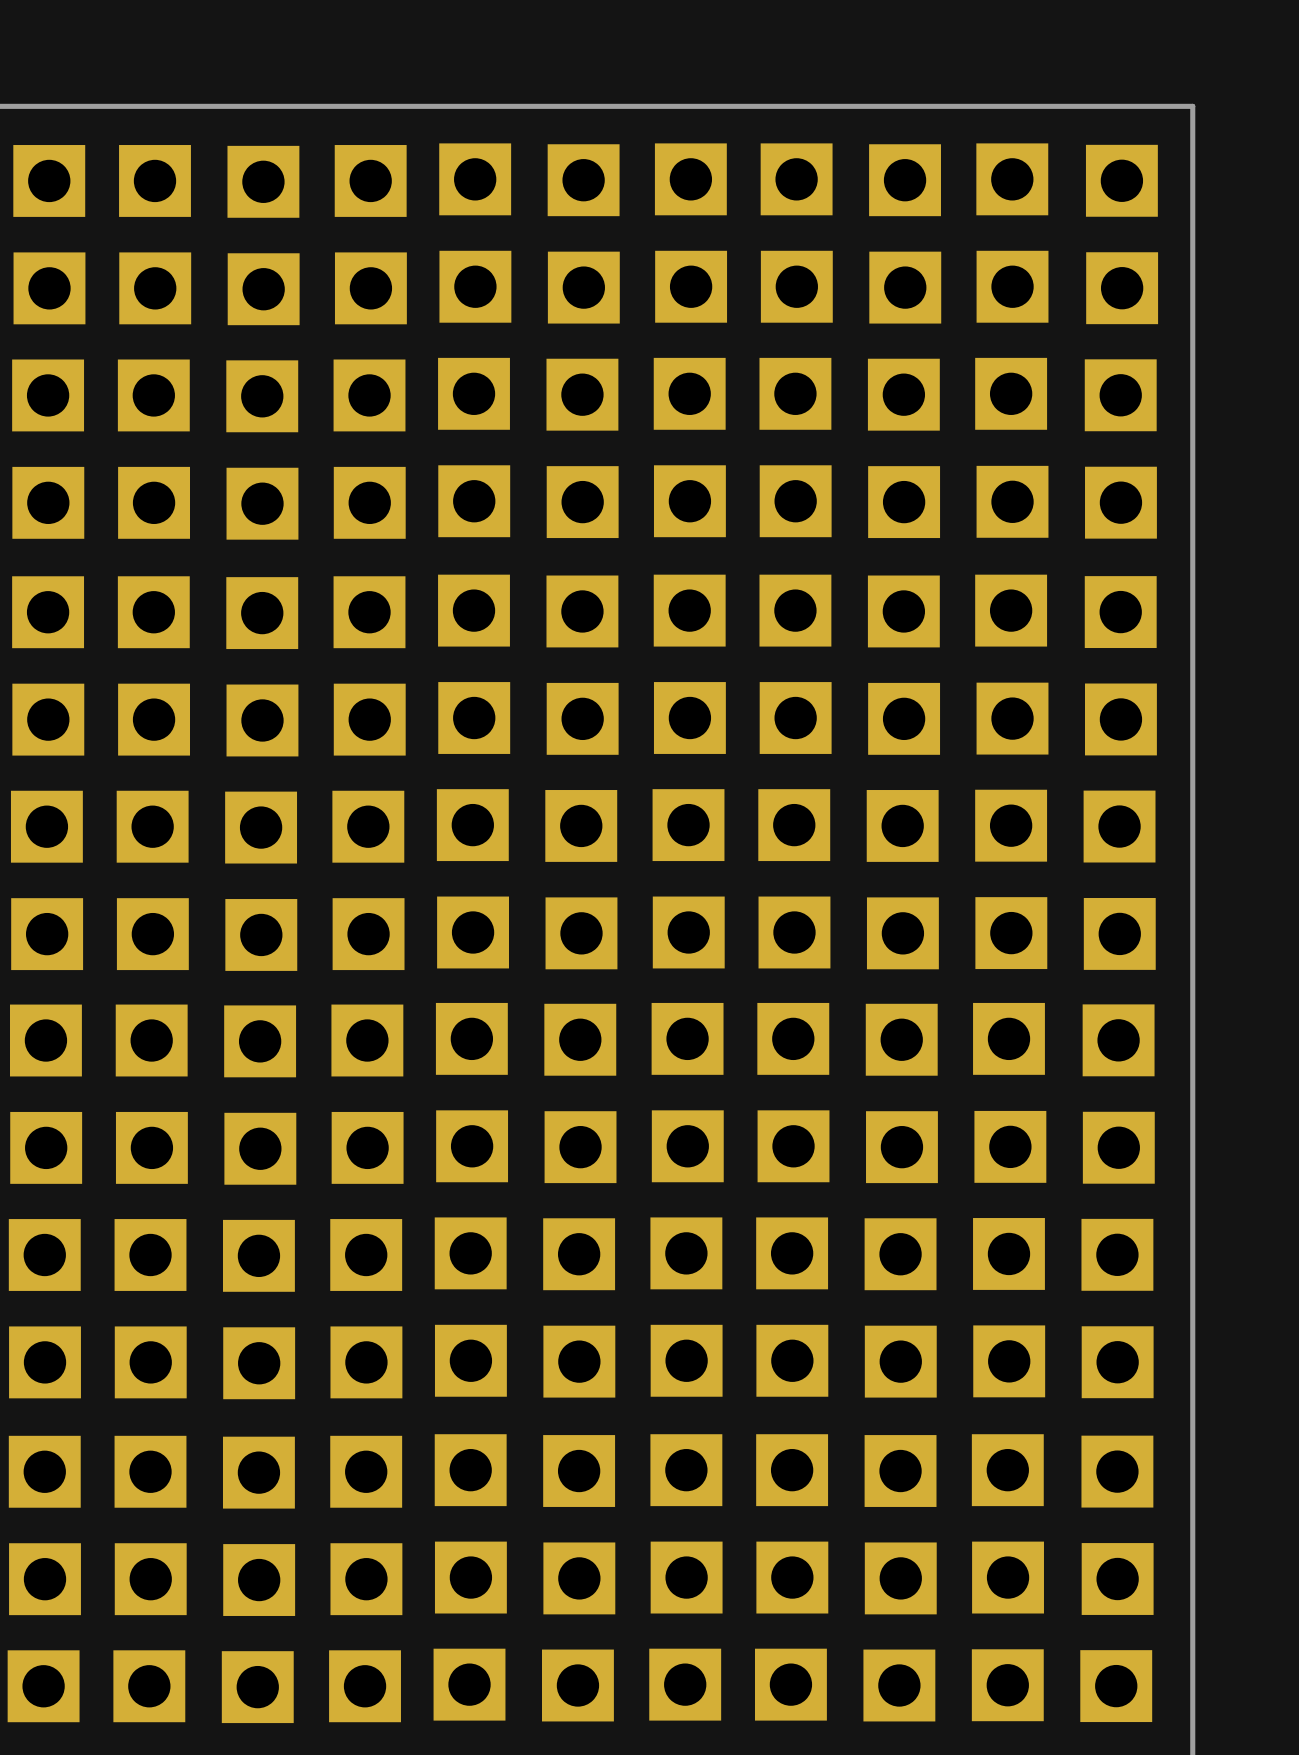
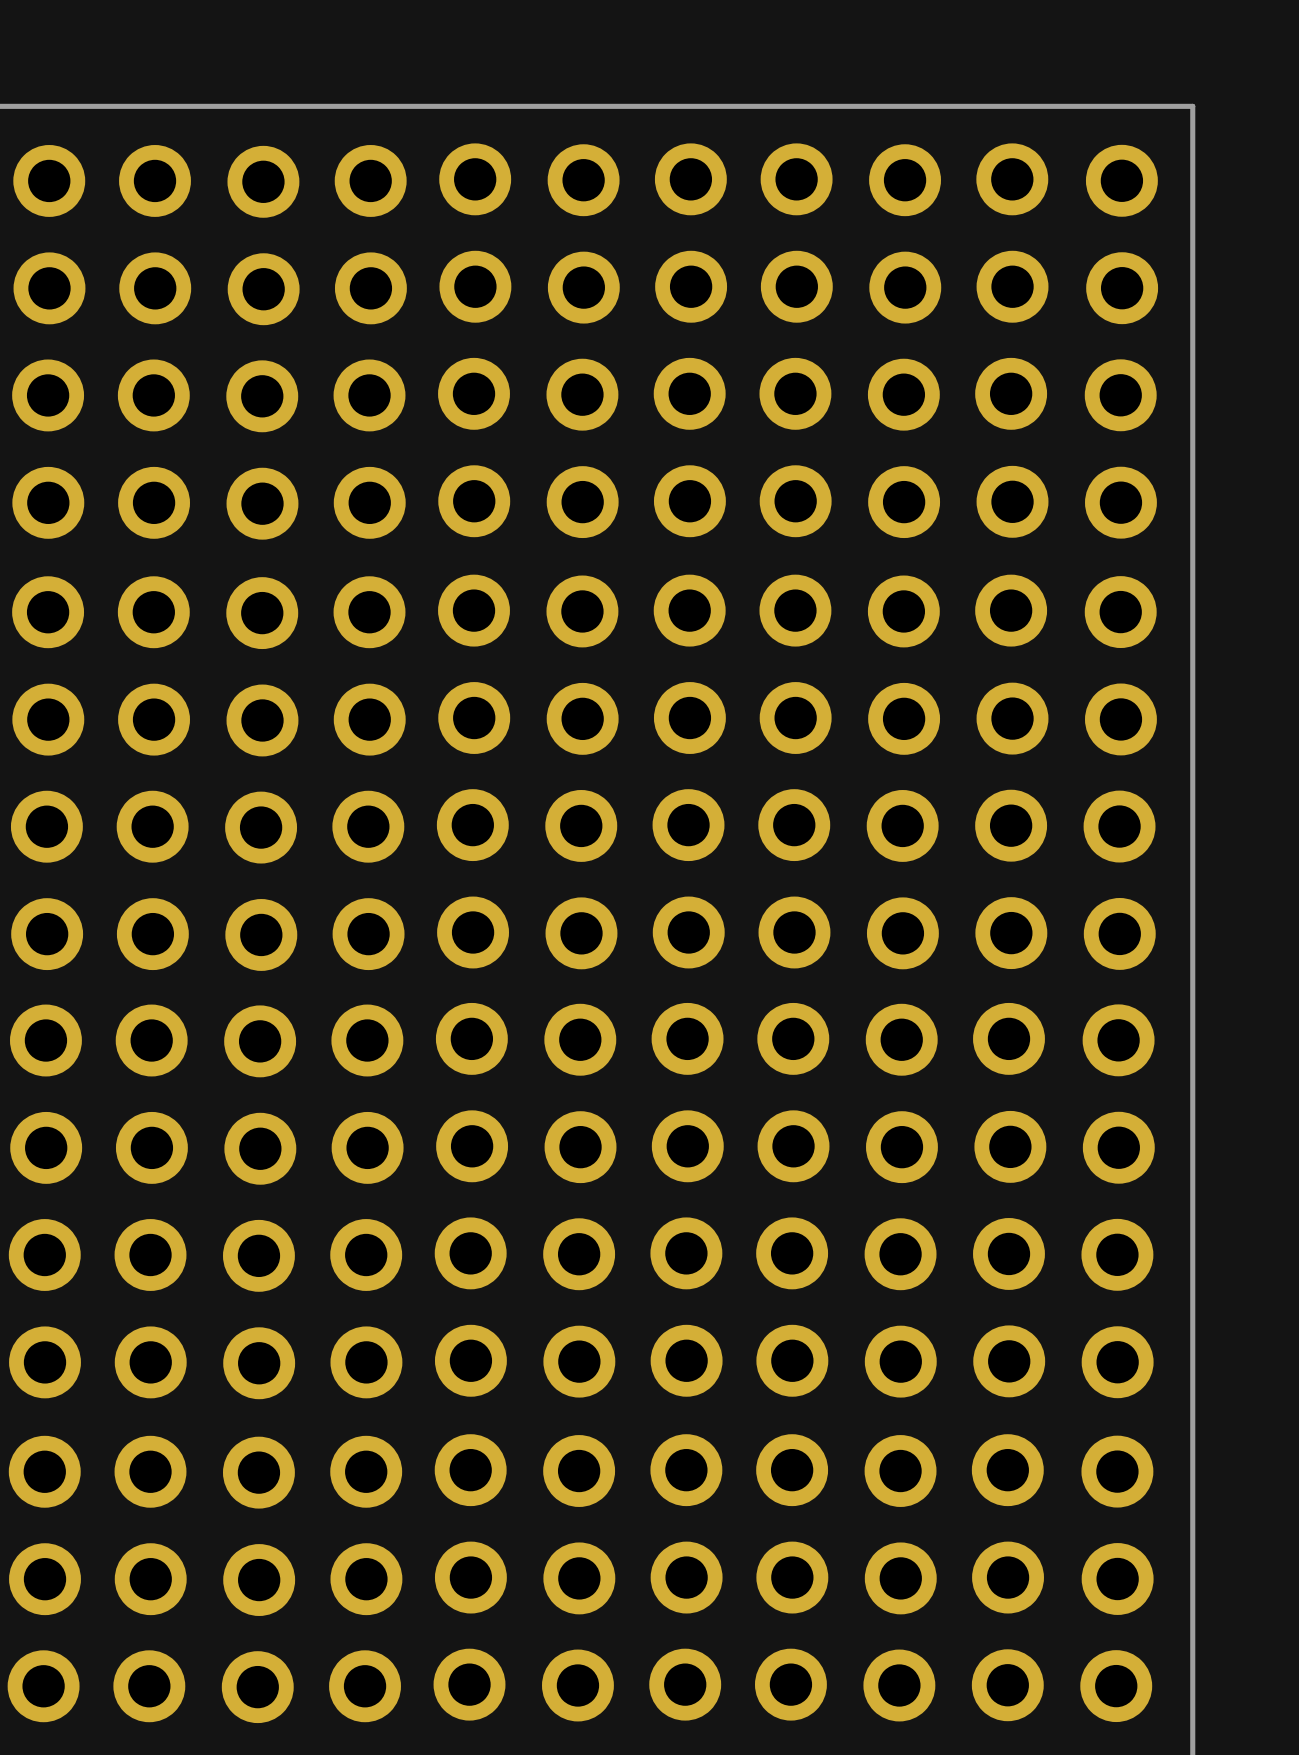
part footprint: [439, 143, 512, 216] -> [439, 143, 512, 216]
part footprint: [654, 143, 727, 216] -> [654, 143, 727, 216]
part footprint: [760, 143, 833, 216] -> [760, 143, 833, 216]
part footprint: [976, 143, 1049, 216] -> [976, 143, 1049, 216]
part footprint: [547, 144, 620, 217] -> [547, 144, 620, 217]
part footprint: [869, 144, 941, 217] -> [869, 144, 941, 217]
part footprint: [1085, 144, 1158, 217] -> [1085, 144, 1158, 217]
part footprint: [13, 145, 86, 217] -> [13, 145, 86, 217]
part footprint: [119, 145, 191, 217] -> [119, 145, 191, 217]
part footprint: [227, 145, 300, 218] -> [227, 145, 300, 218]
part footprint: [334, 145, 407, 217] -> [334, 145, 407, 217]
part footprint: [439, 250, 512, 323] -> [439, 250, 512, 323]
part footprint: [655, 250, 728, 323] -> [655, 250, 728, 323]
part footprint: [760, 250, 833, 323] -> [760, 250, 833, 323]
part footprint: [976, 250, 1049, 323] -> [976, 250, 1049, 323]
part footprint: [547, 251, 620, 324] -> [547, 251, 620, 324]
part footprint: [869, 251, 942, 324] -> [869, 251, 942, 324]
part footprint: [13, 252, 86, 325] -> [13, 252, 86, 325]
part footprint: [119, 252, 192, 325] -> [119, 252, 192, 325]
part footprint: [334, 252, 407, 325] -> [334, 252, 407, 325]
part footprint: [1086, 252, 1159, 325] -> [1086, 252, 1159, 325]
part footprint: [227, 253, 300, 326] -> [227, 253, 300, 326]
part footprint: [438, 357, 510, 430] -> [438, 357, 510, 430]
part footprint: [653, 357, 726, 430] -> [653, 357, 726, 430]
part footprint: [759, 357, 832, 430] -> [759, 357, 832, 430]
part footprint: [975, 357, 1048, 430] -> [975, 357, 1048, 430]
part footprint: [546, 358, 619, 431] -> [546, 358, 619, 431]
part footprint: [867, 358, 940, 431] -> [867, 358, 940, 431]
part footprint: [12, 359, 85, 432] -> [12, 359, 85, 432]
part footprint: [117, 359, 190, 432] -> [117, 359, 190, 432]
part footprint: [333, 359, 406, 432] -> [333, 359, 406, 432]
part footprint: [1084, 359, 1157, 432] -> [1084, 359, 1157, 432]
part footprint: [226, 360, 299, 433] -> [226, 360, 299, 433]
part footprint: [438, 465, 511, 538] -> [438, 465, 511, 538]
part footprint: [653, 465, 726, 538] -> [653, 465, 726, 538]
part footprint: [759, 465, 832, 538] -> [759, 465, 832, 538]
part footprint: [976, 465, 1049, 538] -> [976, 465, 1049, 538]
part footprint: [12, 466, 85, 539] -> [12, 466, 85, 539]
part footprint: [118, 466, 190, 539] -> [118, 466, 190, 539]
part footprint: [333, 466, 406, 539] -> [333, 466, 406, 539]
part footprint: [546, 466, 619, 539] -> [546, 466, 619, 539]
part footprint: [868, 466, 941, 539] -> [868, 466, 941, 539]
part footprint: [1085, 466, 1157, 539] -> [1085, 466, 1157, 539]
part footprint: [226, 467, 299, 540] -> [226, 467, 299, 540]
part footprint: [438, 574, 510, 647] -> [438, 574, 510, 647]
part footprint: [653, 574, 726, 647] -> [653, 574, 726, 647]
part footprint: [759, 574, 832, 647] -> [759, 574, 832, 647]
part footprint: [975, 574, 1048, 647] -> [975, 574, 1048, 647]
part footprint: [546, 575, 619, 648] -> [546, 575, 619, 648]
part footprint: [867, 575, 940, 648] -> [867, 575, 940, 648]
part footprint: [12, 576, 85, 649] -> [12, 576, 85, 649]
part footprint: [117, 576, 190, 649] -> [117, 576, 190, 649]
part footprint: [333, 576, 406, 649] -> [333, 576, 406, 649]
part footprint: [1084, 576, 1157, 649] -> [1084, 576, 1157, 649]
part footprint: [226, 577, 299, 650] -> [226, 577, 299, 650]
part footprint: [438, 682, 511, 754] -> [438, 682, 511, 754]
part footprint: [546, 682, 619, 755] -> [546, 682, 619, 755]
part footprint: [653, 682, 726, 754] -> [653, 682, 726, 754]
part footprint: [759, 682, 832, 754] -> [759, 682, 832, 754]
part footprint: [868, 682, 941, 755] -> [868, 682, 941, 755]
part footprint: [976, 682, 1049, 755] -> [976, 682, 1049, 755]
part footprint: [12, 683, 85, 756] -> [12, 683, 85, 756]
part footprint: [118, 683, 190, 756] -> [118, 683, 190, 756]
part footprint: [333, 683, 406, 756] -> [333, 683, 406, 756]
part footprint: [1085, 683, 1157, 756] -> [1085, 683, 1157, 756]
part footprint: [226, 684, 299, 757] -> [226, 684, 299, 757]
part footprint: [436, 789, 509, 862] -> [436, 789, 509, 862]
part footprint: [652, 789, 725, 862] -> [652, 789, 725, 862]
part footprint: [758, 789, 831, 862] -> [758, 789, 831, 862]
part footprint: [975, 789, 1048, 862] -> [975, 789, 1048, 862]
part footprint: [10, 790, 83, 863] -> [10, 790, 83, 863]
part footprint: [116, 790, 189, 863] -> [116, 790, 189, 863]
part footprint: [332, 790, 405, 863] -> [332, 790, 405, 863]
part footprint: [545, 790, 618, 862] -> [545, 790, 618, 862]
part footprint: [866, 790, 939, 862] -> [866, 790, 939, 862]
part footprint: [1083, 790, 1156, 863] -> [1083, 790, 1156, 863]
part footprint: [225, 791, 298, 864] -> [225, 791, 298, 864]
part footprint: [437, 896, 510, 969] -> [437, 896, 510, 969]
part footprint: [652, 896, 725, 969] -> [652, 896, 725, 969]
part footprint: [758, 896, 831, 969] -> [758, 896, 831, 969]
part footprint: [545, 897, 618, 970] -> [545, 897, 618, 970]
part footprint: [866, 897, 939, 970] -> [866, 897, 939, 970]
part footprint: [975, 897, 1048, 970] -> [975, 897, 1048, 970]
part footprint: [1083, 897, 1156, 970] -> [1083, 897, 1156, 970]
part footprint: [11, 898, 84, 971] -> [11, 898, 84, 971]
part footprint: [116, 898, 189, 971] -> [116, 898, 189, 971]
part footprint: [332, 898, 405, 971] -> [332, 898, 405, 971]
part footprint: [225, 899, 298, 971] -> [225, 899, 298, 971]
part footprint: [435, 1002, 508, 1075] -> [435, 1002, 508, 1075]
part footprint: [651, 1002, 724, 1075] -> [651, 1002, 724, 1075]
part footprint: [757, 1002, 830, 1075] -> [757, 1002, 830, 1075]
part footprint: [973, 1002, 1045, 1075] -> [973, 1002, 1045, 1075]
part footprint: [544, 1003, 617, 1076] -> [544, 1003, 617, 1076]
part footprint: [865, 1003, 938, 1076] -> [865, 1003, 938, 1076]
part footprint: [10, 1004, 82, 1077] -> [10, 1004, 82, 1077]
part footprint: [115, 1004, 188, 1077] -> [115, 1004, 188, 1077]
part footprint: [331, 1004, 404, 1077] -> [331, 1004, 404, 1077]
part footprint: [1082, 1004, 1155, 1077] -> [1082, 1004, 1155, 1077]
part footprint: [224, 1005, 297, 1078] -> [224, 1005, 297, 1078]
part footprint: [436, 1110, 509, 1183] -> [436, 1110, 509, 1183]
part footprint: [651, 1110, 724, 1183] -> [651, 1110, 724, 1183]
part footprint: [757, 1110, 830, 1183] -> [757, 1110, 830, 1183]
part footprint: [974, 1110, 1047, 1183] -> [974, 1110, 1047, 1183]
part footprint: [10, 1111, 83, 1184] -> [10, 1111, 83, 1184]
part footprint: [115, 1111, 188, 1184] -> [115, 1111, 188, 1184]
part footprint: [331, 1111, 404, 1184] -> [331, 1111, 404, 1184]
part footprint: [544, 1111, 617, 1184] -> [544, 1111, 617, 1184]
part footprint: [866, 1111, 938, 1184] -> [866, 1111, 938, 1184]
part footprint: [1082, 1111, 1155, 1184] -> [1082, 1111, 1155, 1184]
part footprint: [224, 1112, 297, 1185] -> [224, 1112, 297, 1185]
part footprint: [434, 1217, 507, 1290] -> [434, 1217, 507, 1290]
part footprint: [650, 1217, 723, 1290] -> [650, 1217, 723, 1290]
part footprint: [756, 1217, 829, 1290] -> [756, 1217, 829, 1290]
part footprint: [543, 1218, 616, 1291] -> [543, 1218, 616, 1291]
part footprint: [864, 1218, 937, 1291] -> [864, 1218, 937, 1291]
part footprint: [973, 1218, 1045, 1290] -> [973, 1218, 1045, 1290]
part footprint: [1081, 1218, 1154, 1291] -> [1081, 1218, 1154, 1291]
part footprint: [8, 1219, 81, 1291] -> [8, 1219, 81, 1291]
part footprint: [114, 1219, 187, 1291] -> [114, 1219, 187, 1291]
part footprint: [223, 1219, 295, 1292] -> [223, 1219, 295, 1292]
part footprint: [330, 1219, 403, 1291] -> [330, 1219, 403, 1291]
part footprint: [434, 1324, 507, 1397] -> [434, 1324, 507, 1397]
part footprint: [650, 1324, 723, 1397] -> [650, 1324, 723, 1397]
part footprint: [756, 1324, 829, 1397] -> [756, 1324, 829, 1397]
part footprint: [543, 1325, 616, 1398] -> [543, 1325, 616, 1398]
part footprint: [864, 1325, 937, 1398] -> [864, 1325, 937, 1398]
part footprint: [973, 1325, 1046, 1398] -> [973, 1325, 1046, 1398]
part footprint: [9, 1326, 81, 1399] -> [9, 1326, 81, 1399]
part footprint: [114, 1326, 187, 1399] -> [114, 1326, 187, 1399]
part footprint: [330, 1326, 403, 1399] -> [330, 1326, 403, 1399]
part footprint: [1081, 1326, 1154, 1399] -> [1081, 1326, 1154, 1399]
part footprint: [223, 1327, 296, 1400] -> [223, 1327, 296, 1400]
part footprint: [434, 1434, 507, 1507] -> [434, 1434, 507, 1507]
part footprint: [650, 1434, 723, 1507] -> [650, 1434, 723, 1507]
part footprint: [756, 1434, 829, 1507] -> [756, 1434, 829, 1507]
part footprint: [971, 1434, 1044, 1507] -> [971, 1434, 1044, 1507]
part footprint: [8, 1435, 81, 1508] -> [8, 1435, 81, 1508]
part footprint: [114, 1435, 187, 1508] -> [114, 1435, 187, 1508]
part footprint: [330, 1435, 403, 1508] -> [330, 1435, 403, 1508]
part footprint: [543, 1435, 616, 1507] -> [543, 1435, 616, 1507]
part footprint: [864, 1435, 937, 1507] -> [864, 1435, 937, 1507]
part footprint: [1081, 1435, 1154, 1508] -> [1081, 1435, 1154, 1508]
part footprint: [222, 1436, 295, 1509] -> [222, 1436, 295, 1509]
part footprint: [434, 1541, 507, 1614] -> [434, 1541, 507, 1614]
part footprint: [650, 1541, 723, 1614] -> [650, 1541, 723, 1614]
part footprint: [756, 1541, 829, 1614] -> [756, 1541, 829, 1614]
part footprint: [972, 1541, 1044, 1614] -> [972, 1541, 1044, 1614]
part footprint: [543, 1542, 616, 1615] -> [543, 1542, 616, 1615]
part footprint: [864, 1542, 937, 1615] -> [864, 1542, 937, 1615]
part footprint: [9, 1543, 81, 1616] -> [9, 1543, 81, 1616]
part footprint: [114, 1543, 187, 1616] -> [114, 1543, 187, 1616]
part footprint: [330, 1543, 403, 1616] -> [330, 1543, 403, 1616]
part footprint: [1081, 1543, 1154, 1615] -> [1081, 1543, 1154, 1615]
part footprint: [223, 1544, 296, 1616] -> [223, 1544, 296, 1616]
part footprint: [433, 1648, 506, 1721] -> [433, 1648, 506, 1721]
part footprint: [649, 1648, 722, 1721] -> [649, 1648, 722, 1721]
part footprint: [754, 1648, 827, 1721] -> [754, 1648, 827, 1721]
part footprint: [542, 1649, 614, 1722] -> [542, 1649, 614, 1722]
part footprint: [863, 1649, 936, 1722] -> [863, 1649, 936, 1722]
part footprint: [971, 1649, 1044, 1722] -> [971, 1649, 1044, 1722]
part footprint: [7, 1650, 80, 1723] -> [7, 1650, 80, 1723]
part footprint: [113, 1650, 186, 1723] -> [113, 1650, 186, 1723]
part footprint: [329, 1650, 401, 1723] -> [329, 1650, 401, 1723]
part footprint: [1080, 1650, 1153, 1723] -> [1080, 1650, 1153, 1723]
part footprint: [221, 1651, 294, 1724] -> [221, 1651, 294, 1724]

